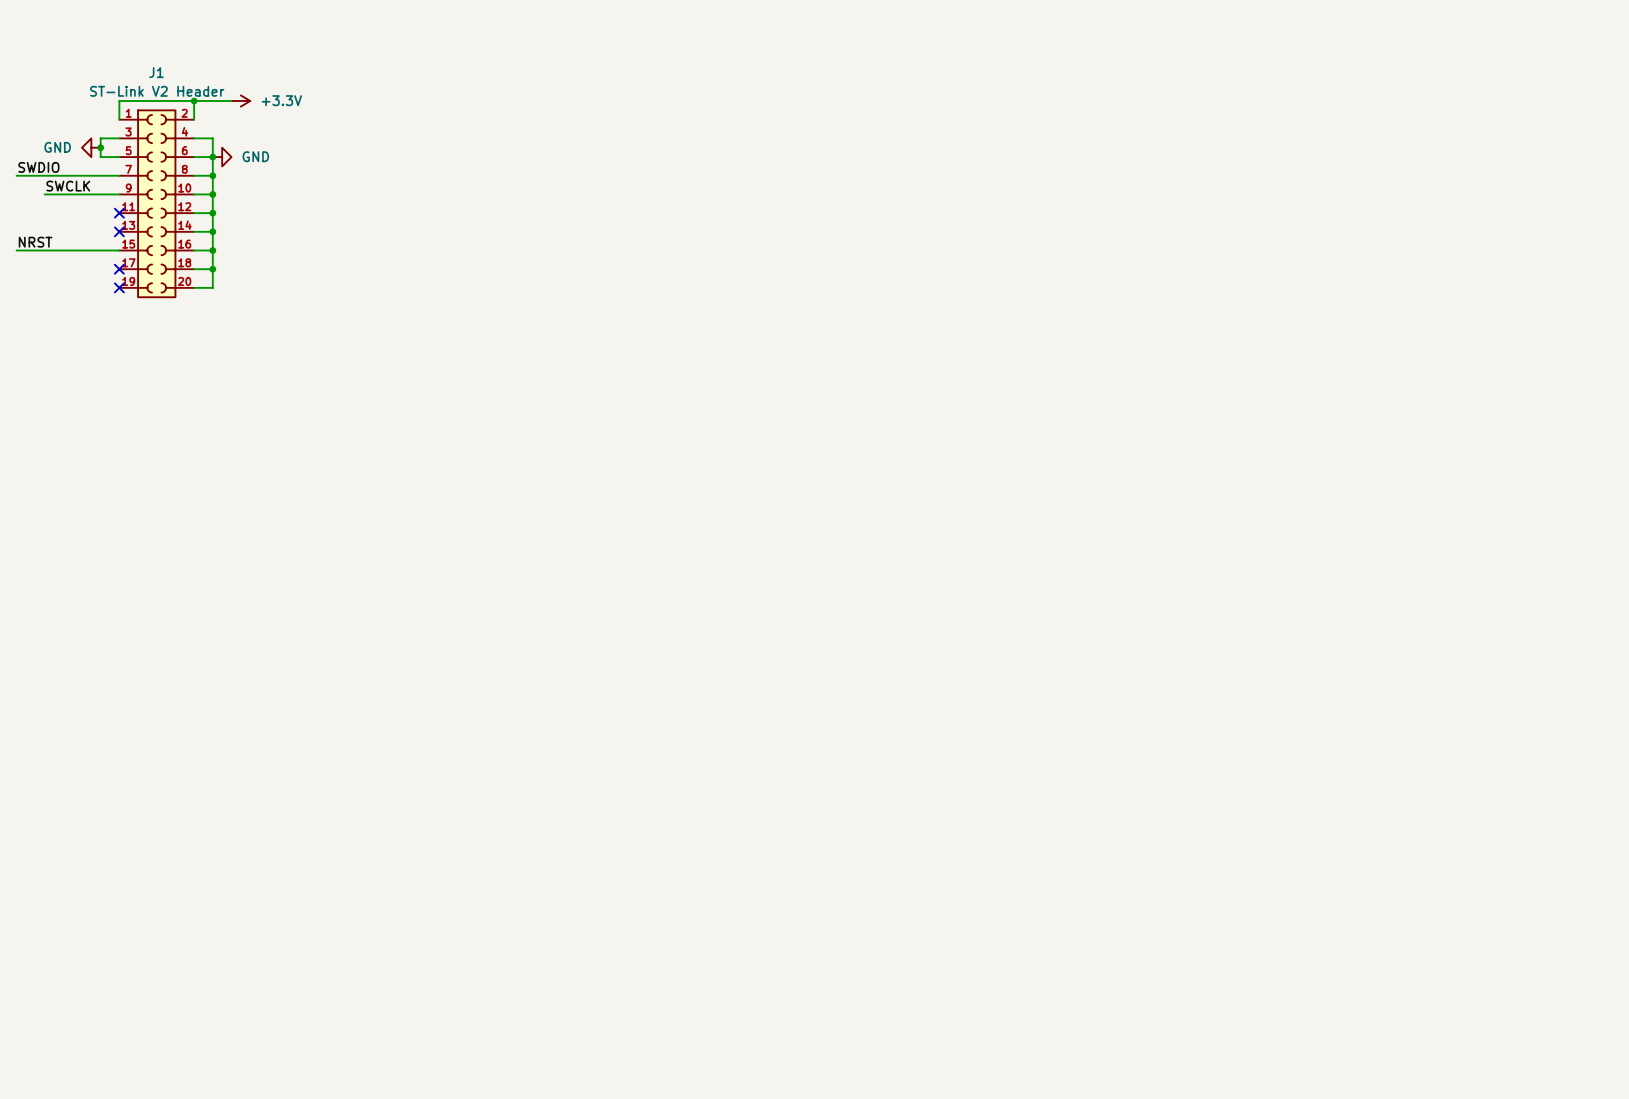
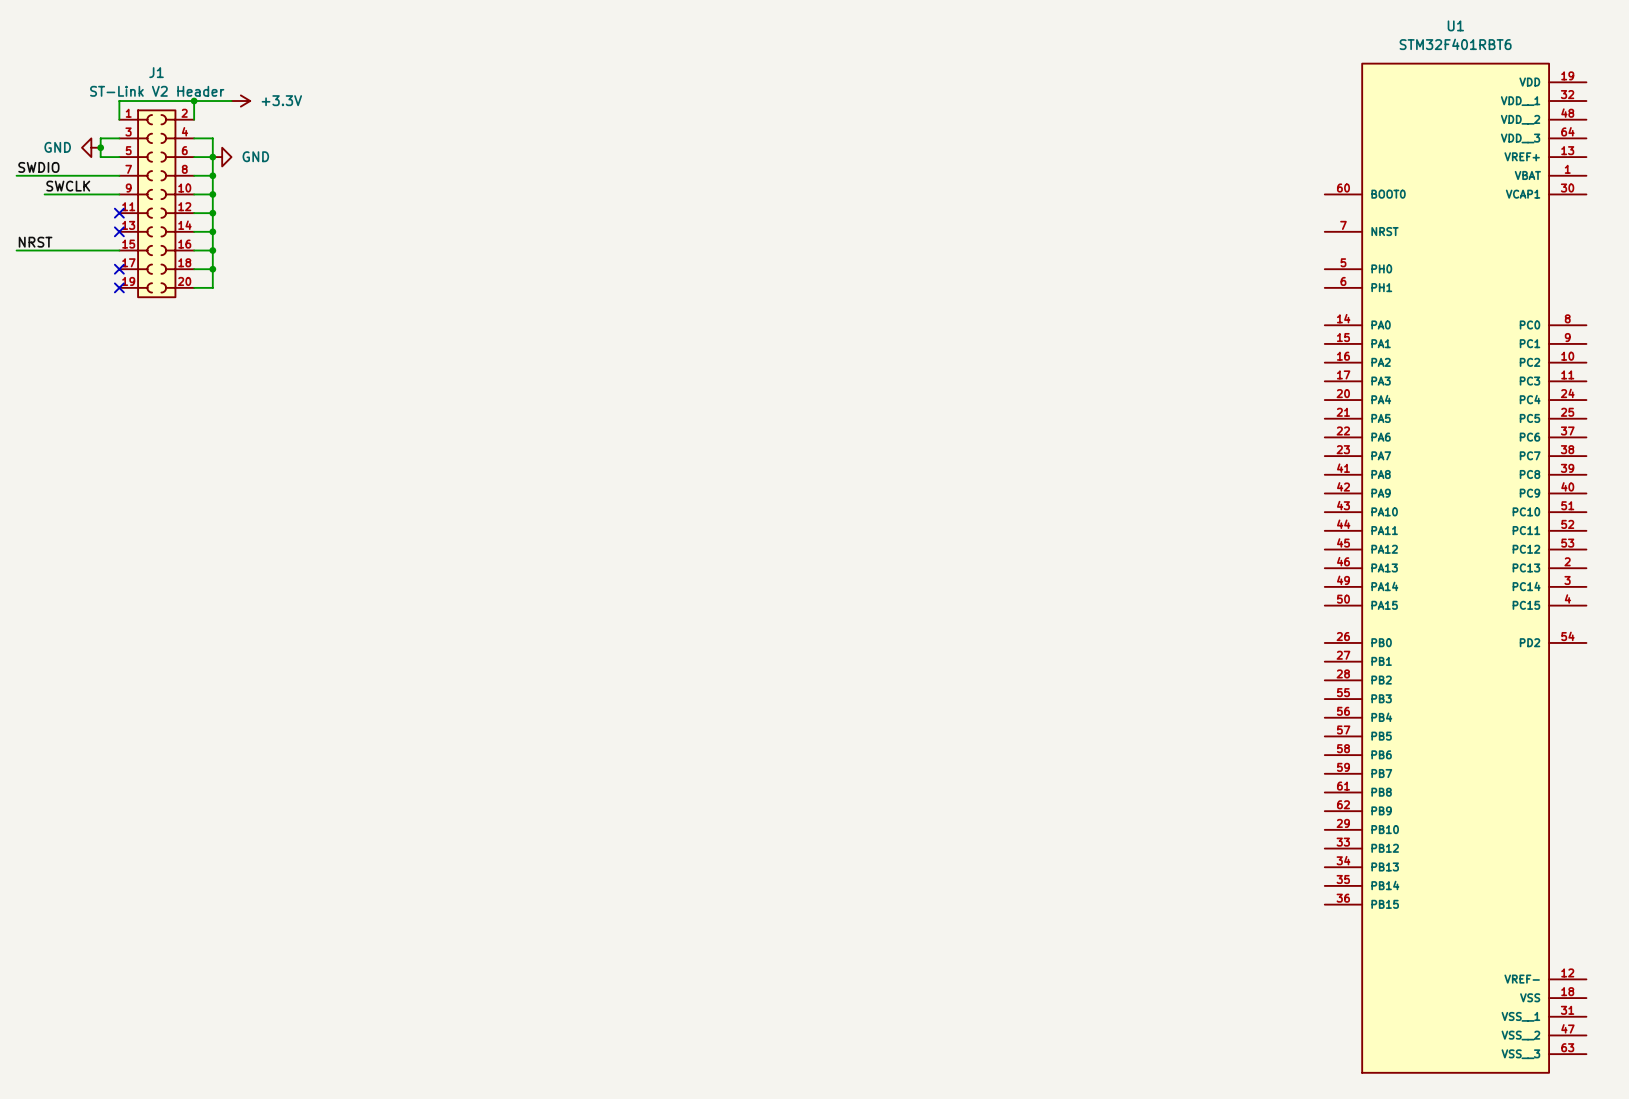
U1: none -> STM32F401RBT6 (1455, 568)

